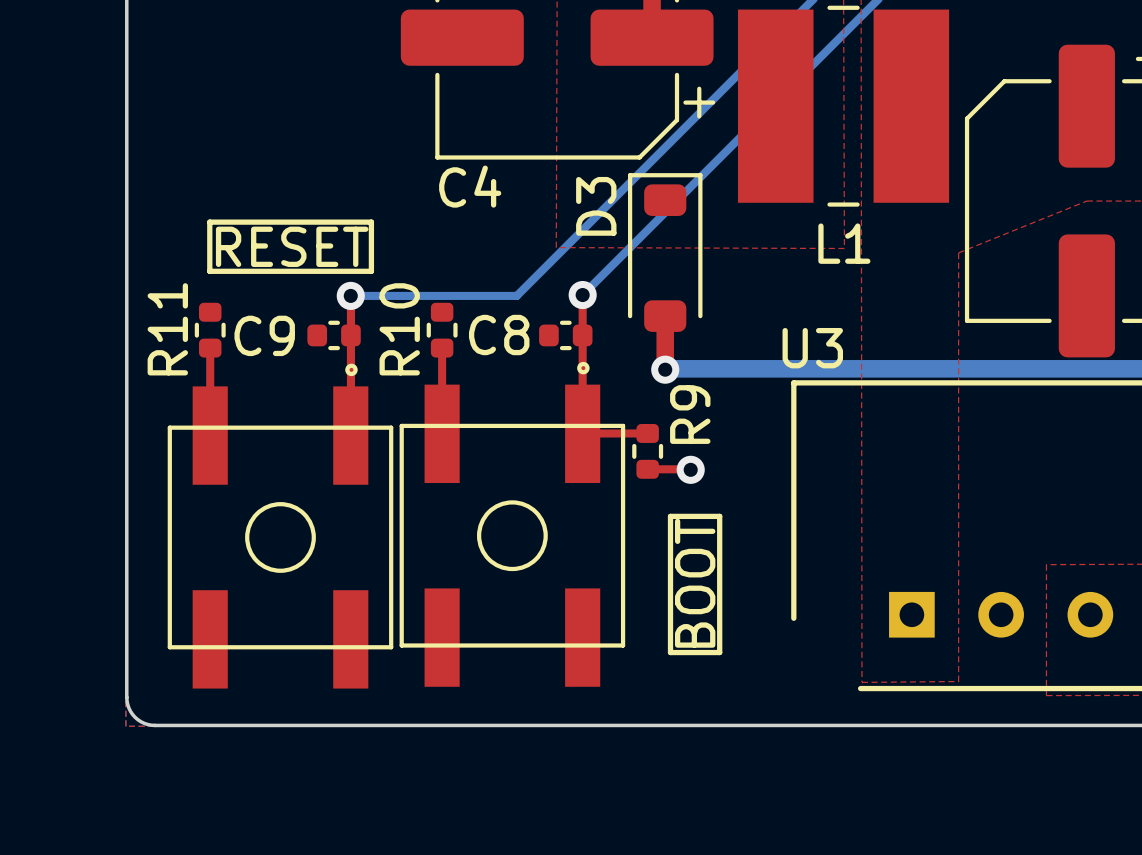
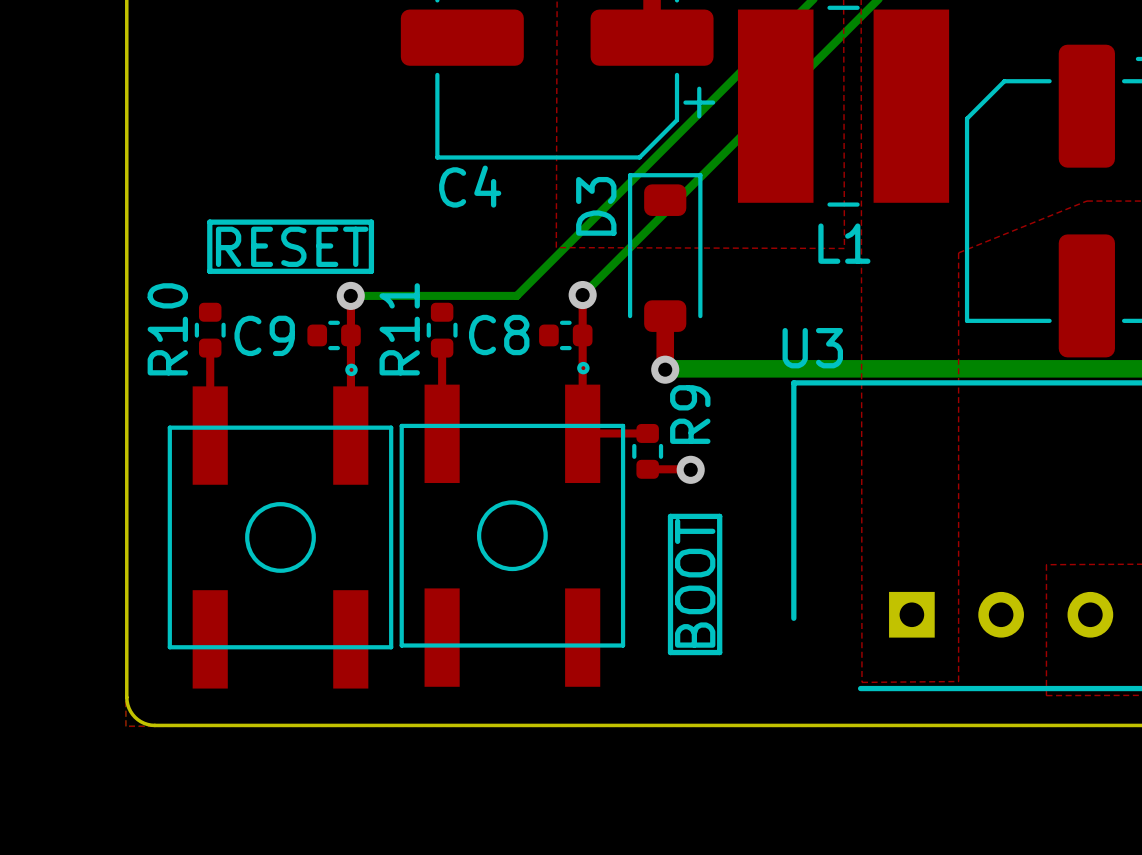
R11 name: R11 (167, 329) -> R10 (167, 329)
R10 name: R10 (399, 329) -> R11 (399, 329)

